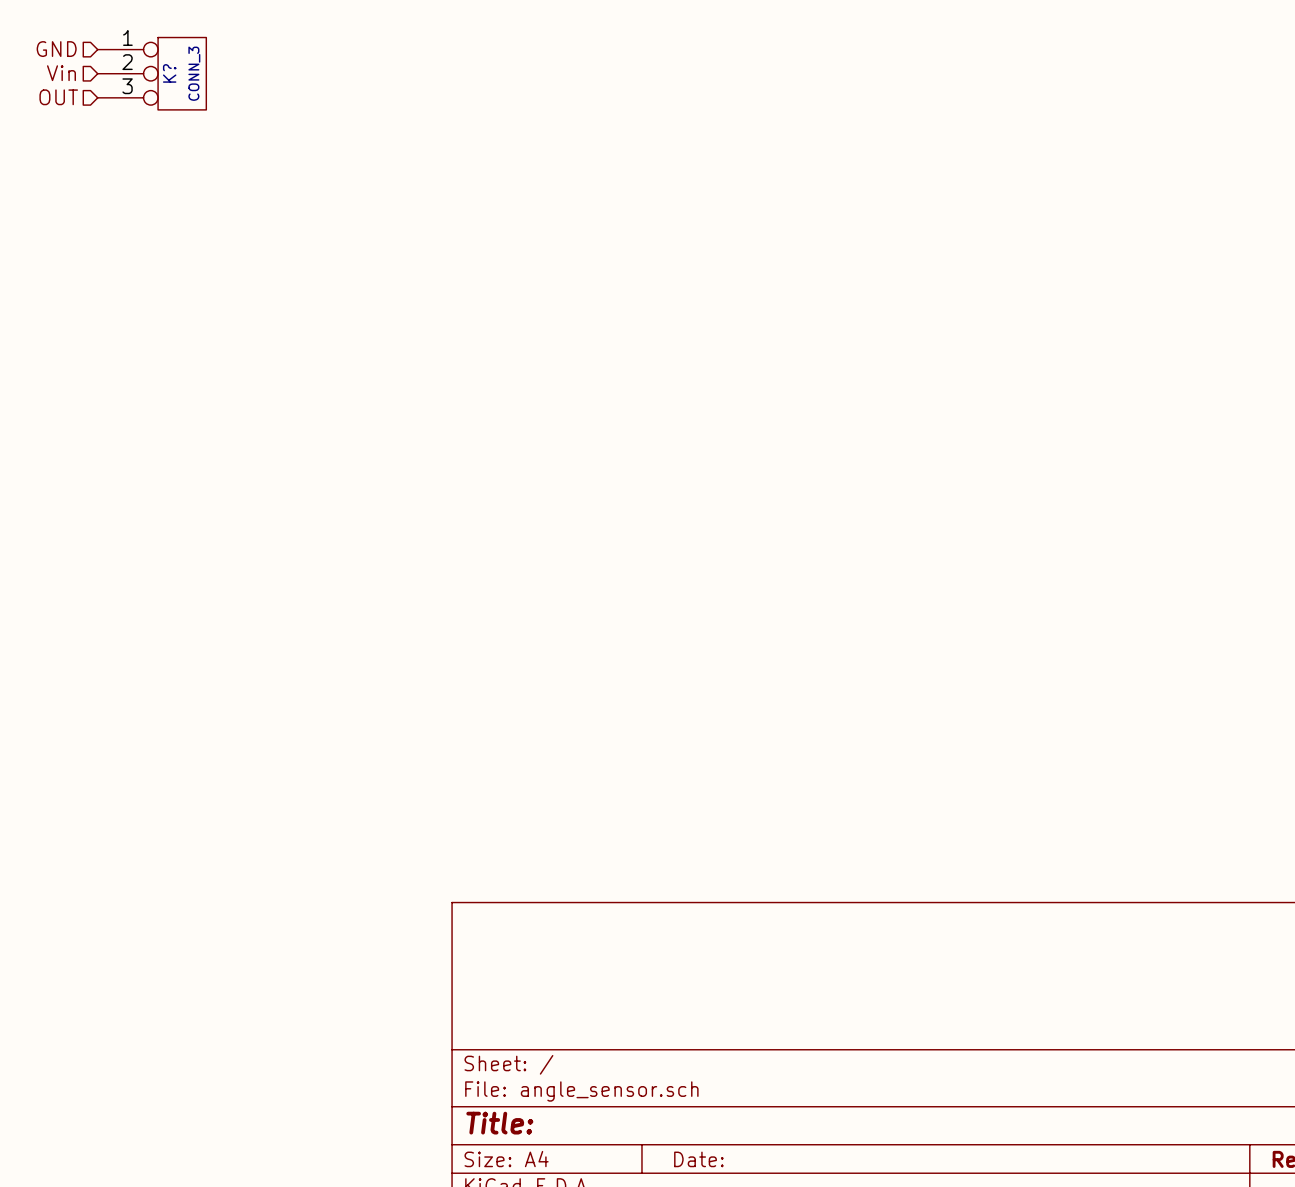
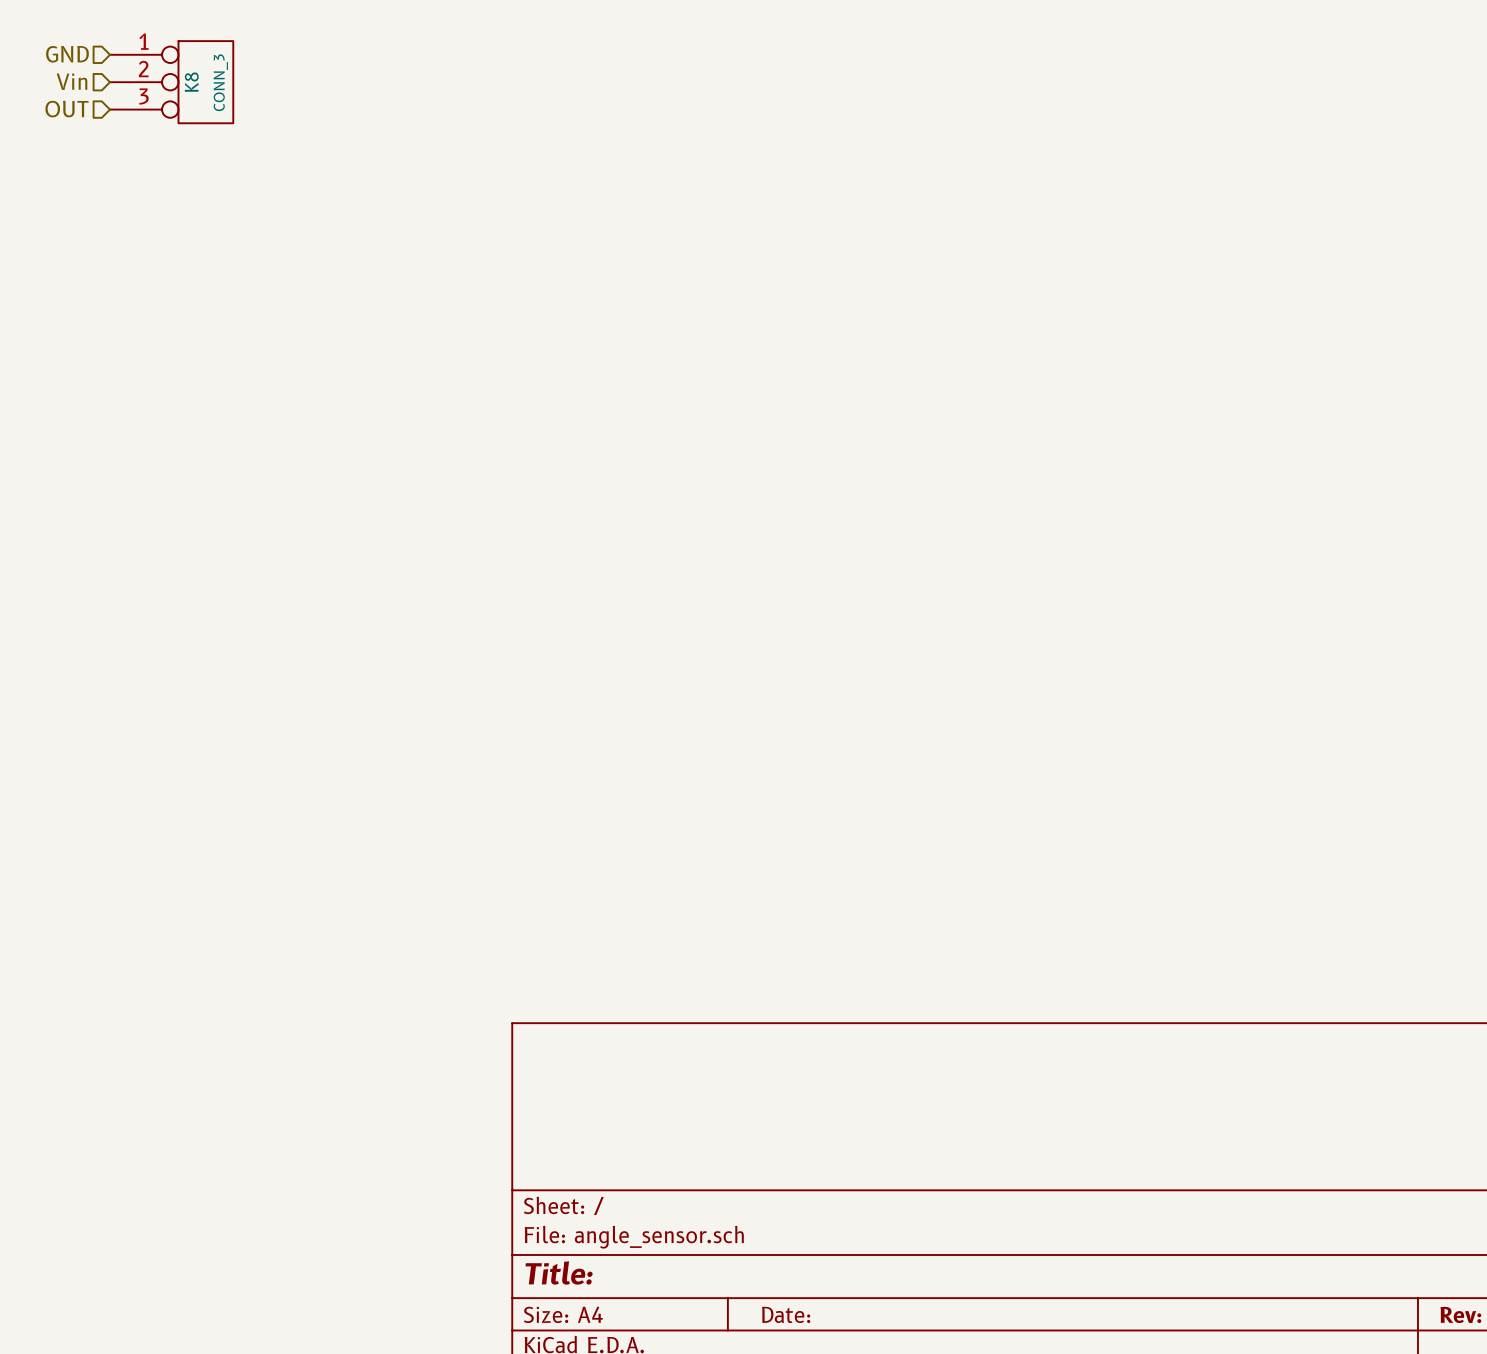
K? name: K? (169, 73) -> K8 (191, 82)

